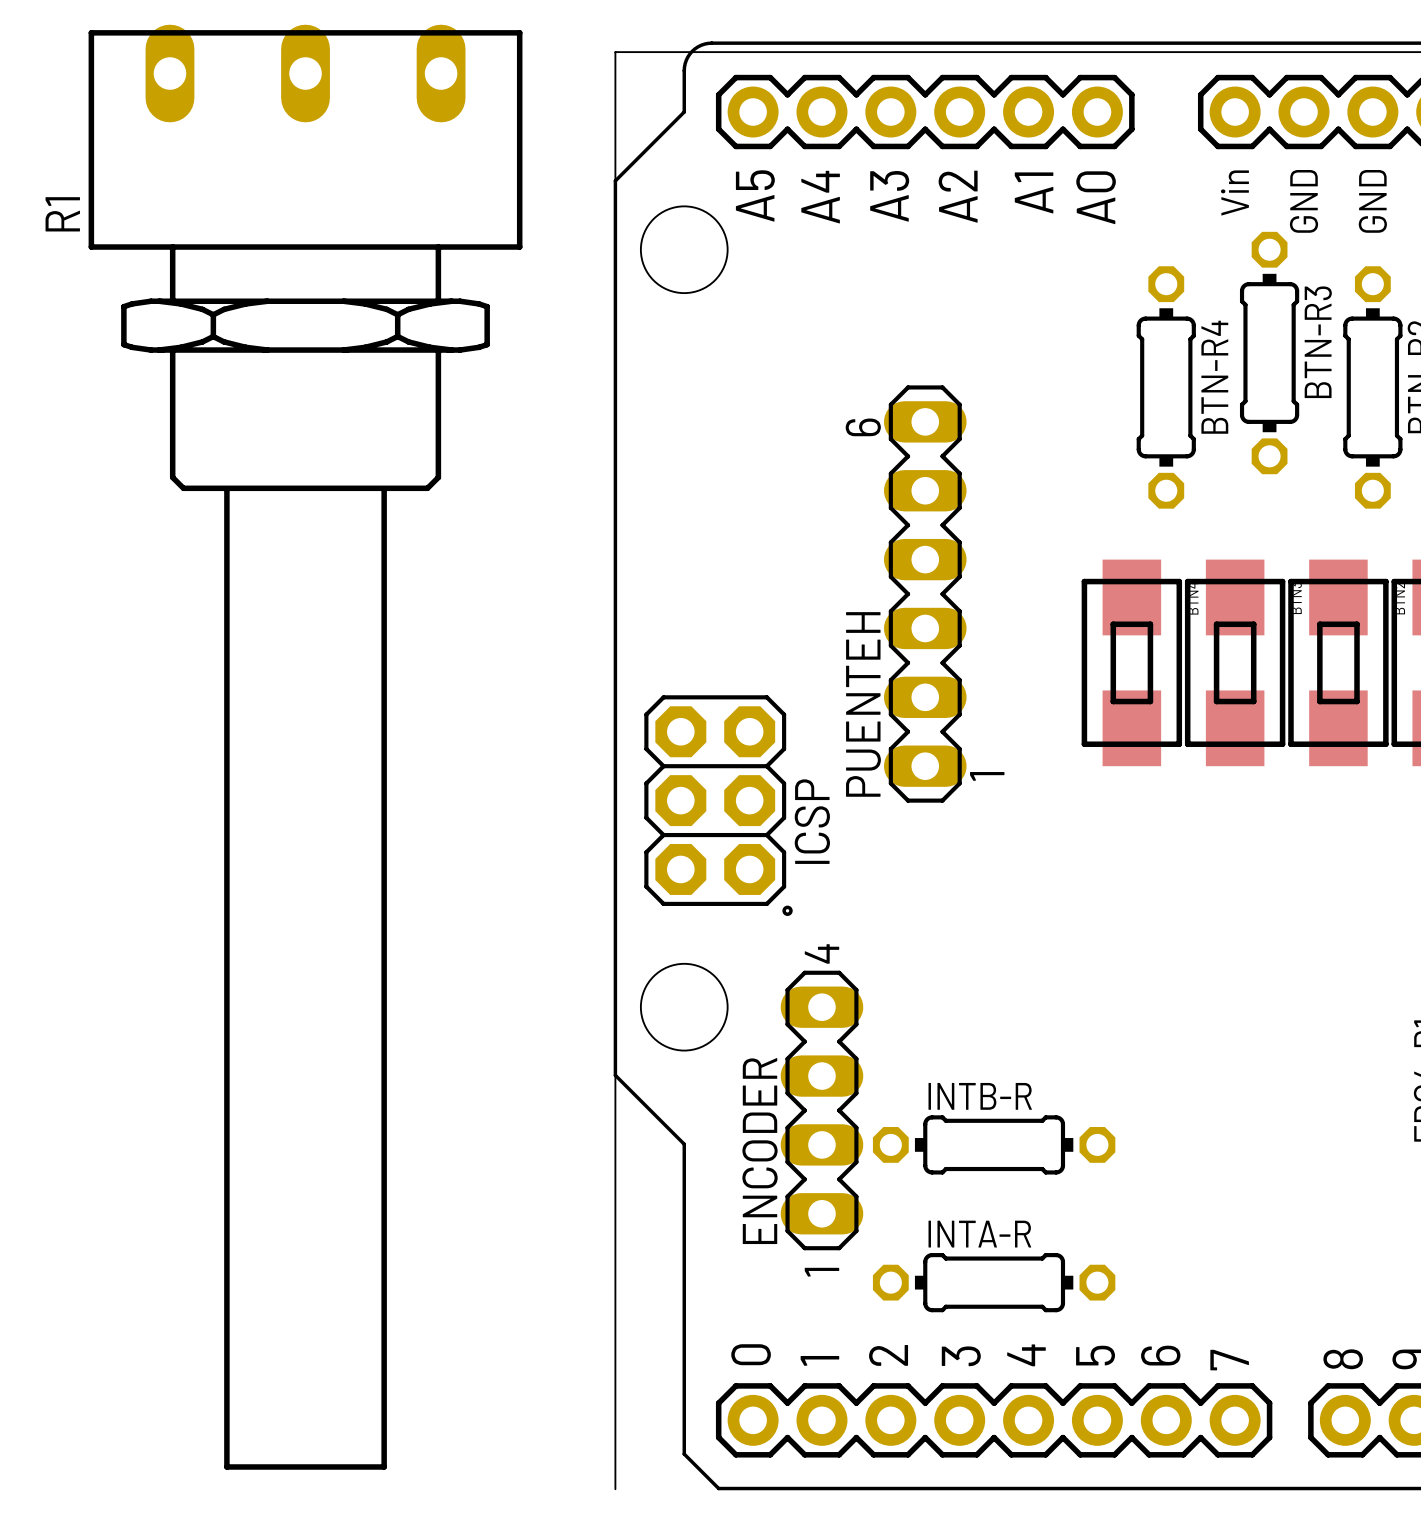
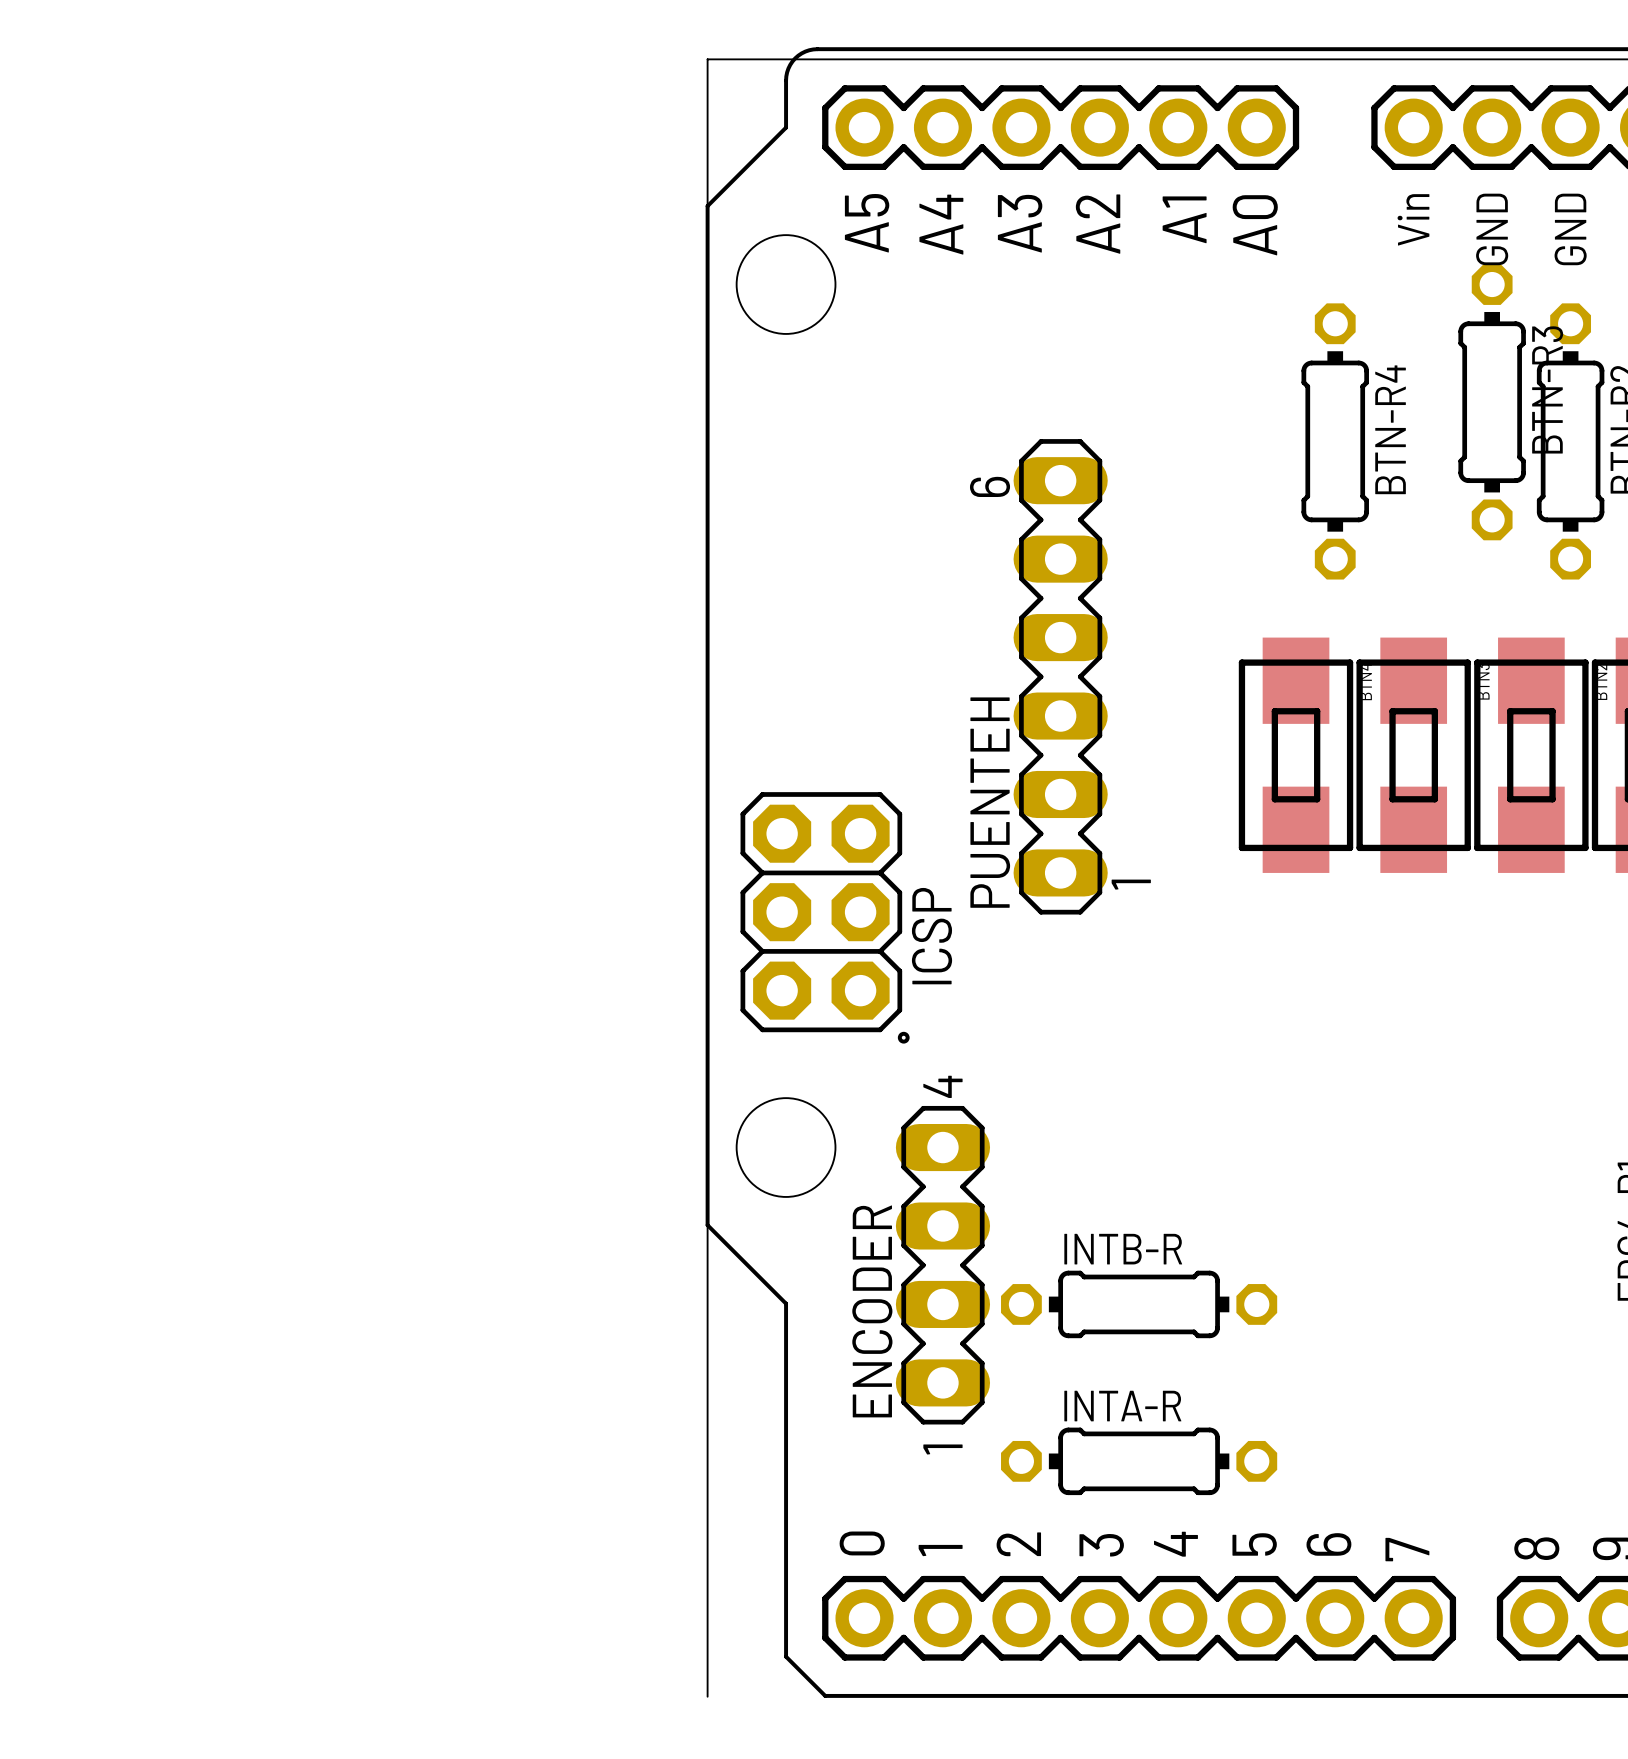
BTN-R3 position: (1269, 353) -> (1492, 402)
R1: (305, 747) -> none

